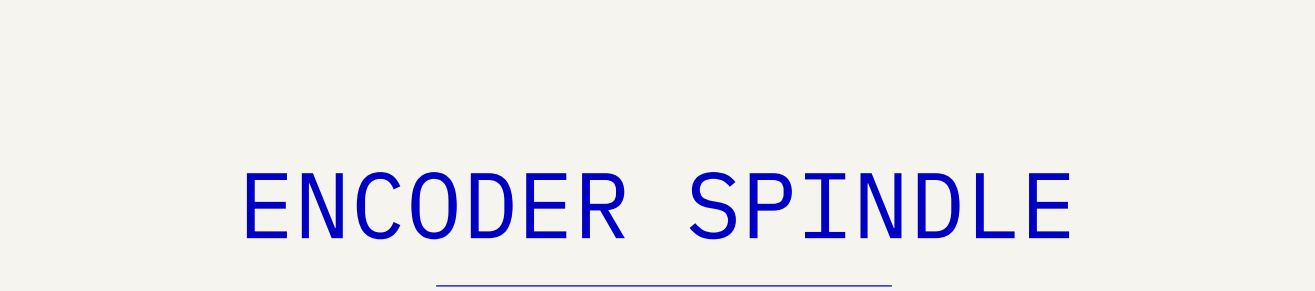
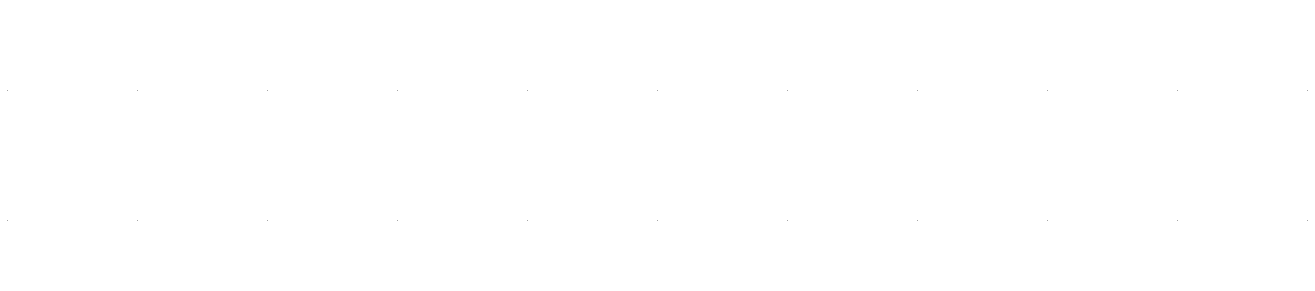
text: ENCODER SPINDLE (657, 205) -> none
line: (436, 285) (891, 285) -> none

